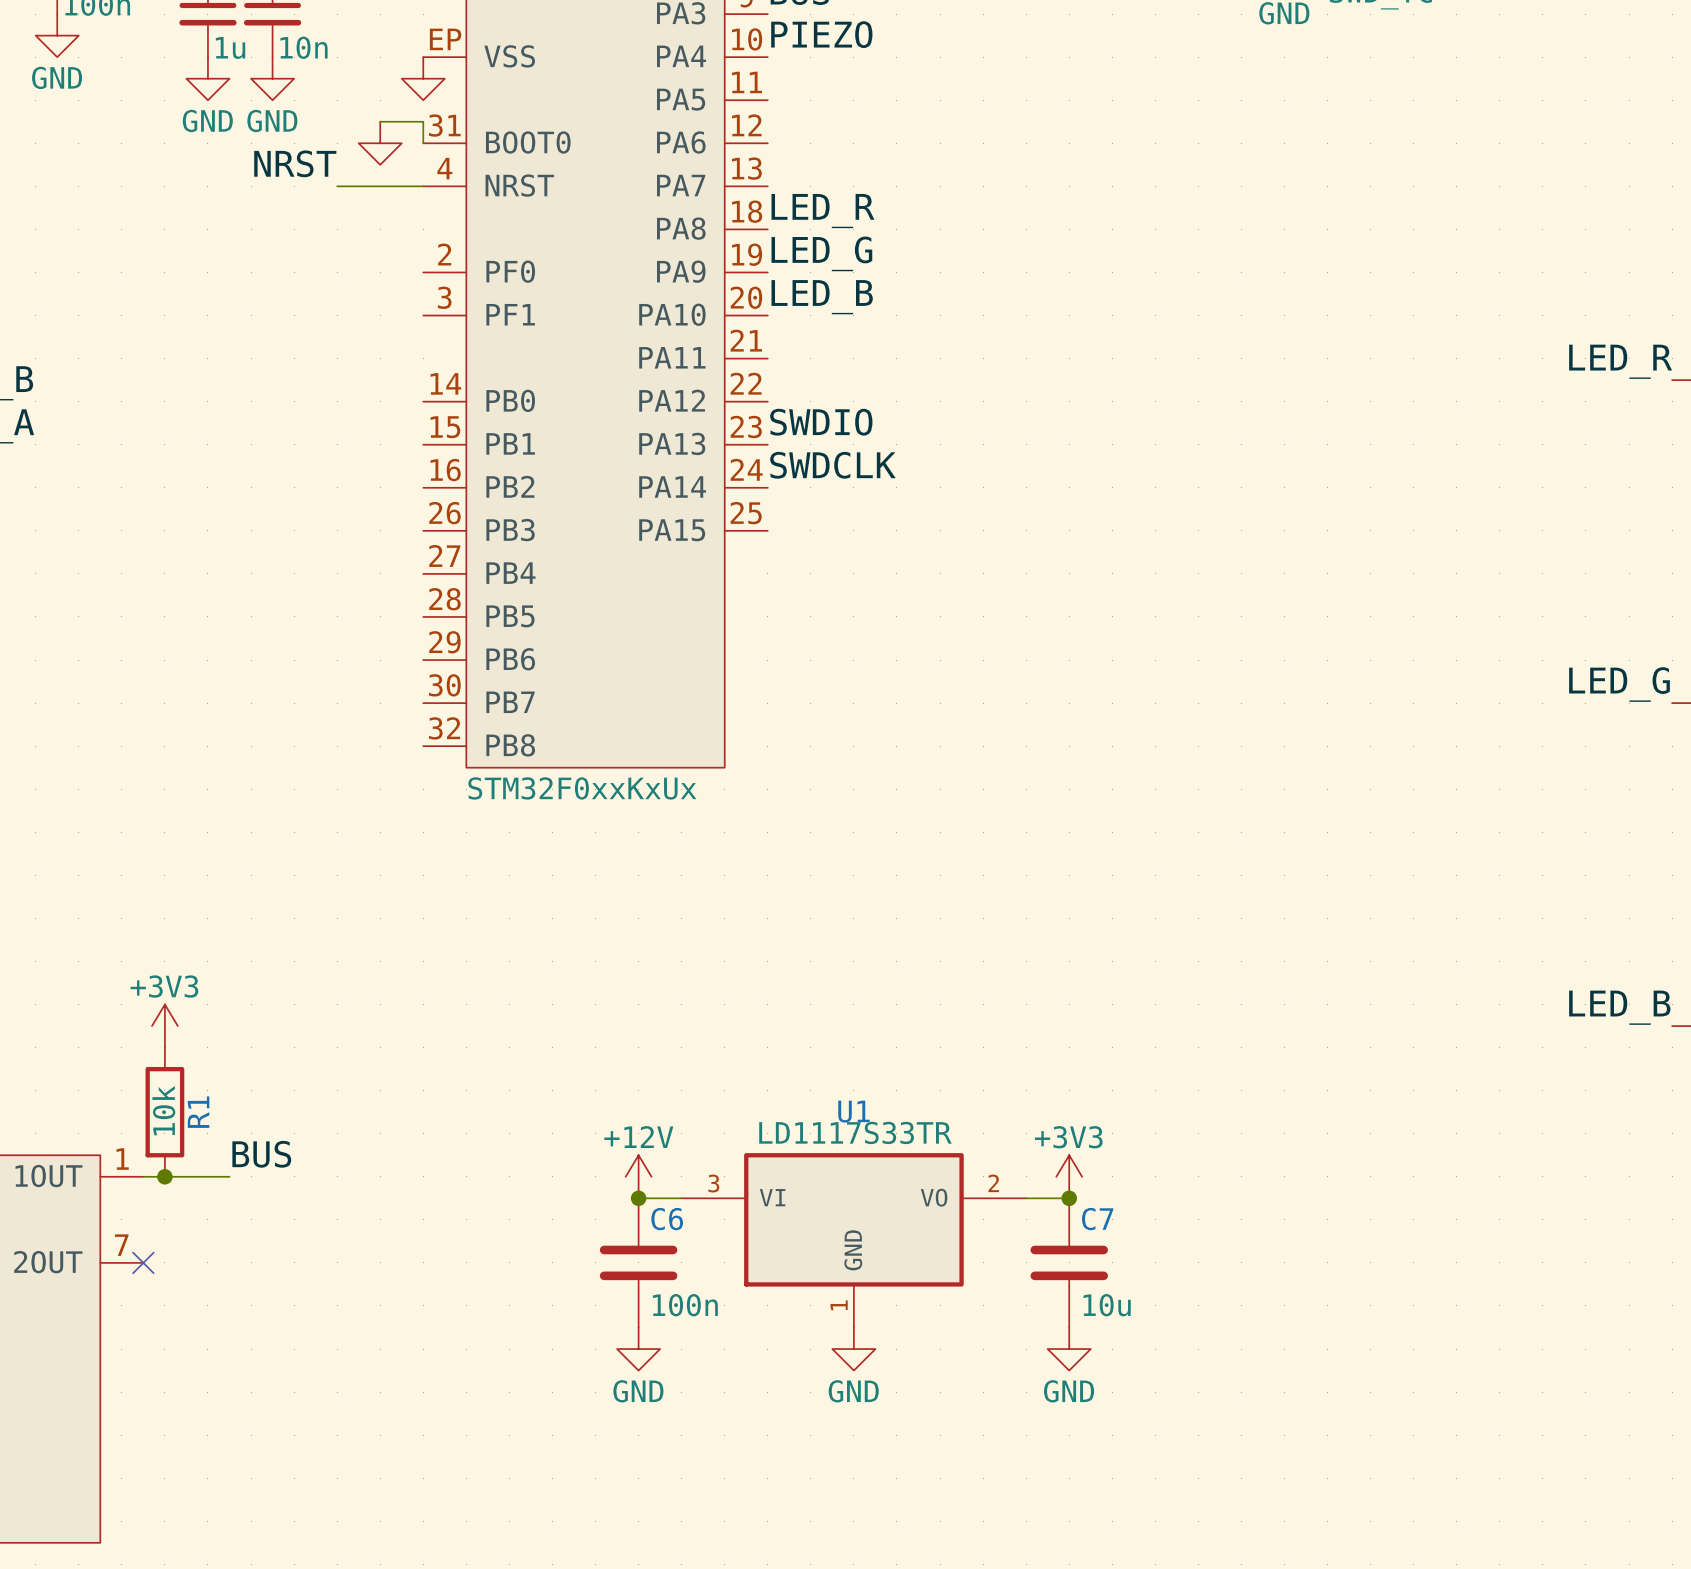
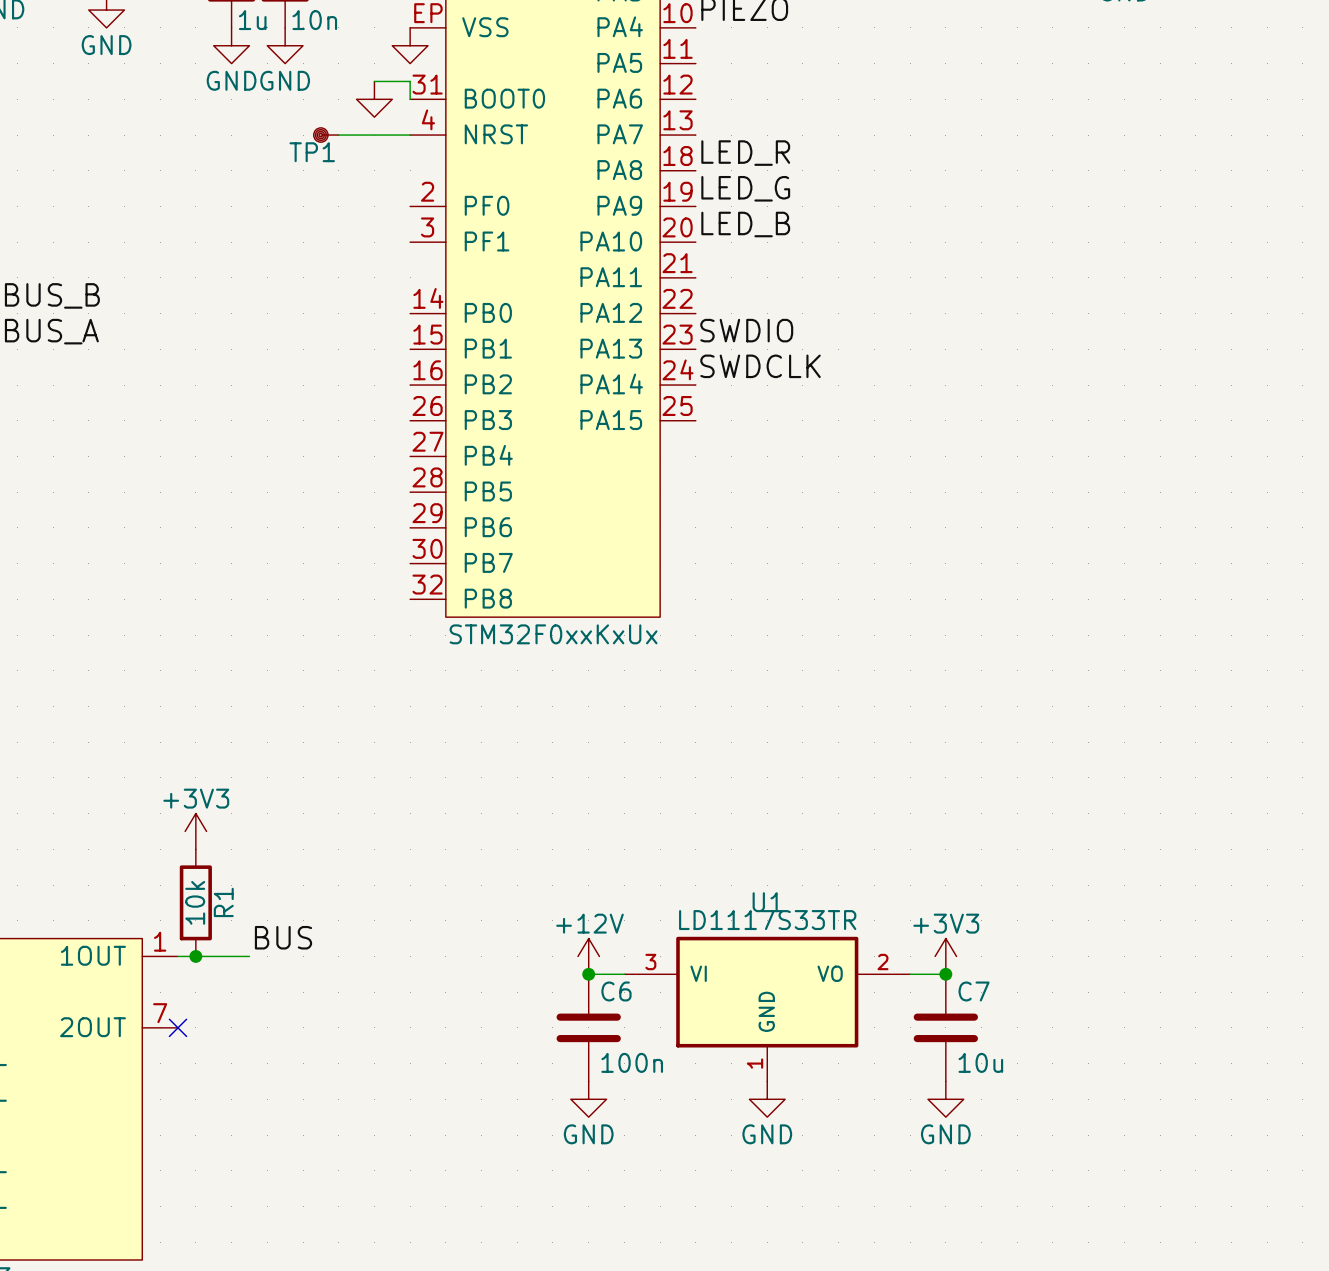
label: NRST (295, 163) -> none
TP1: none -> (326, 135)

